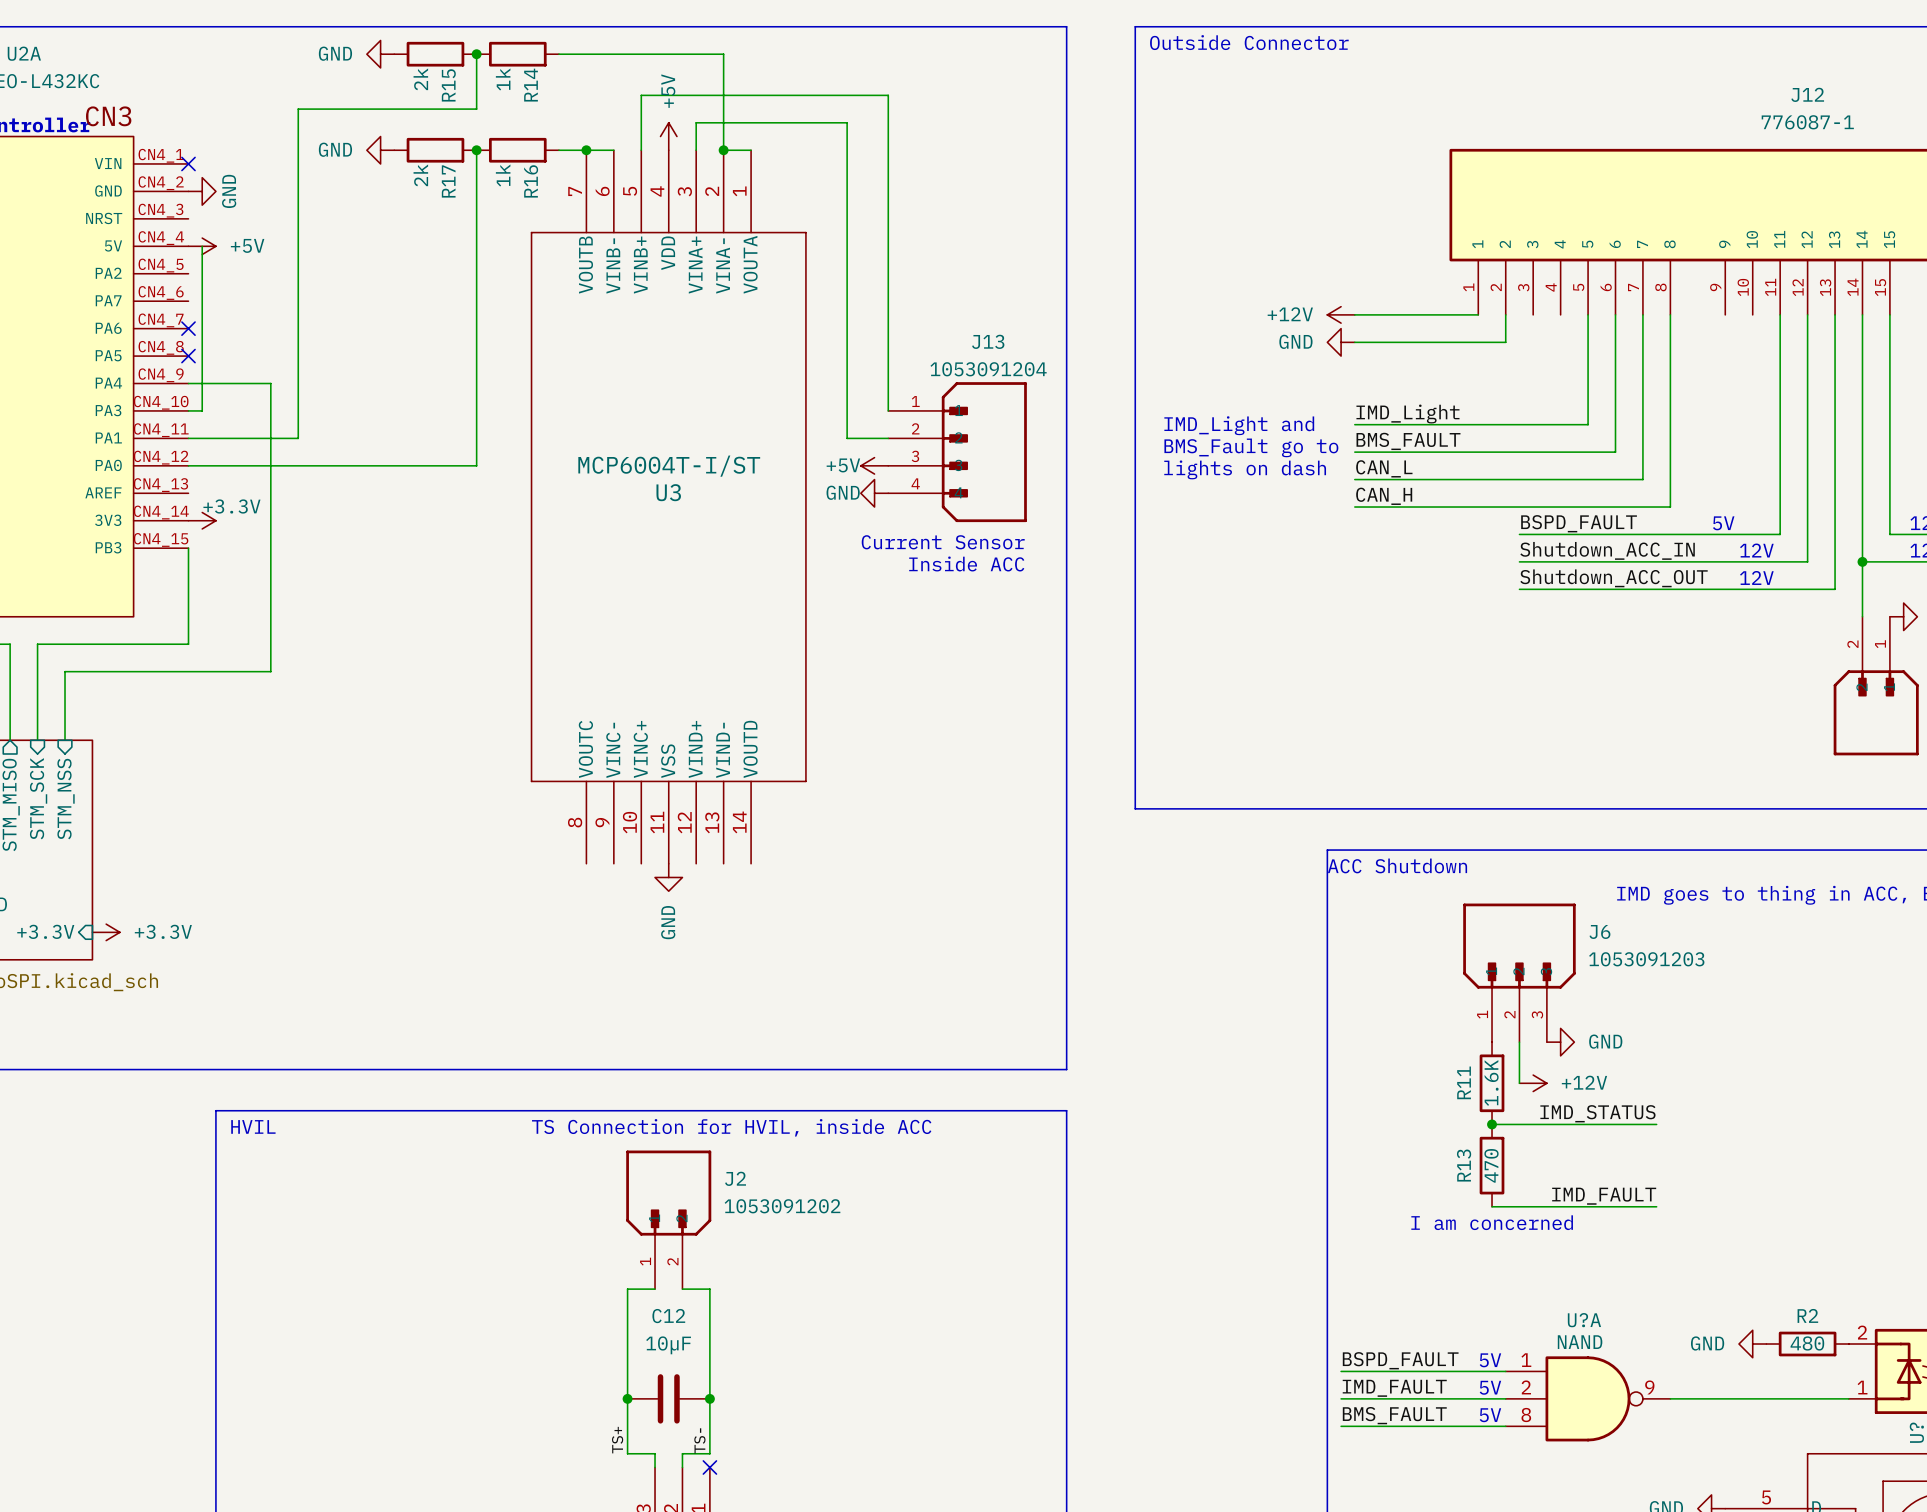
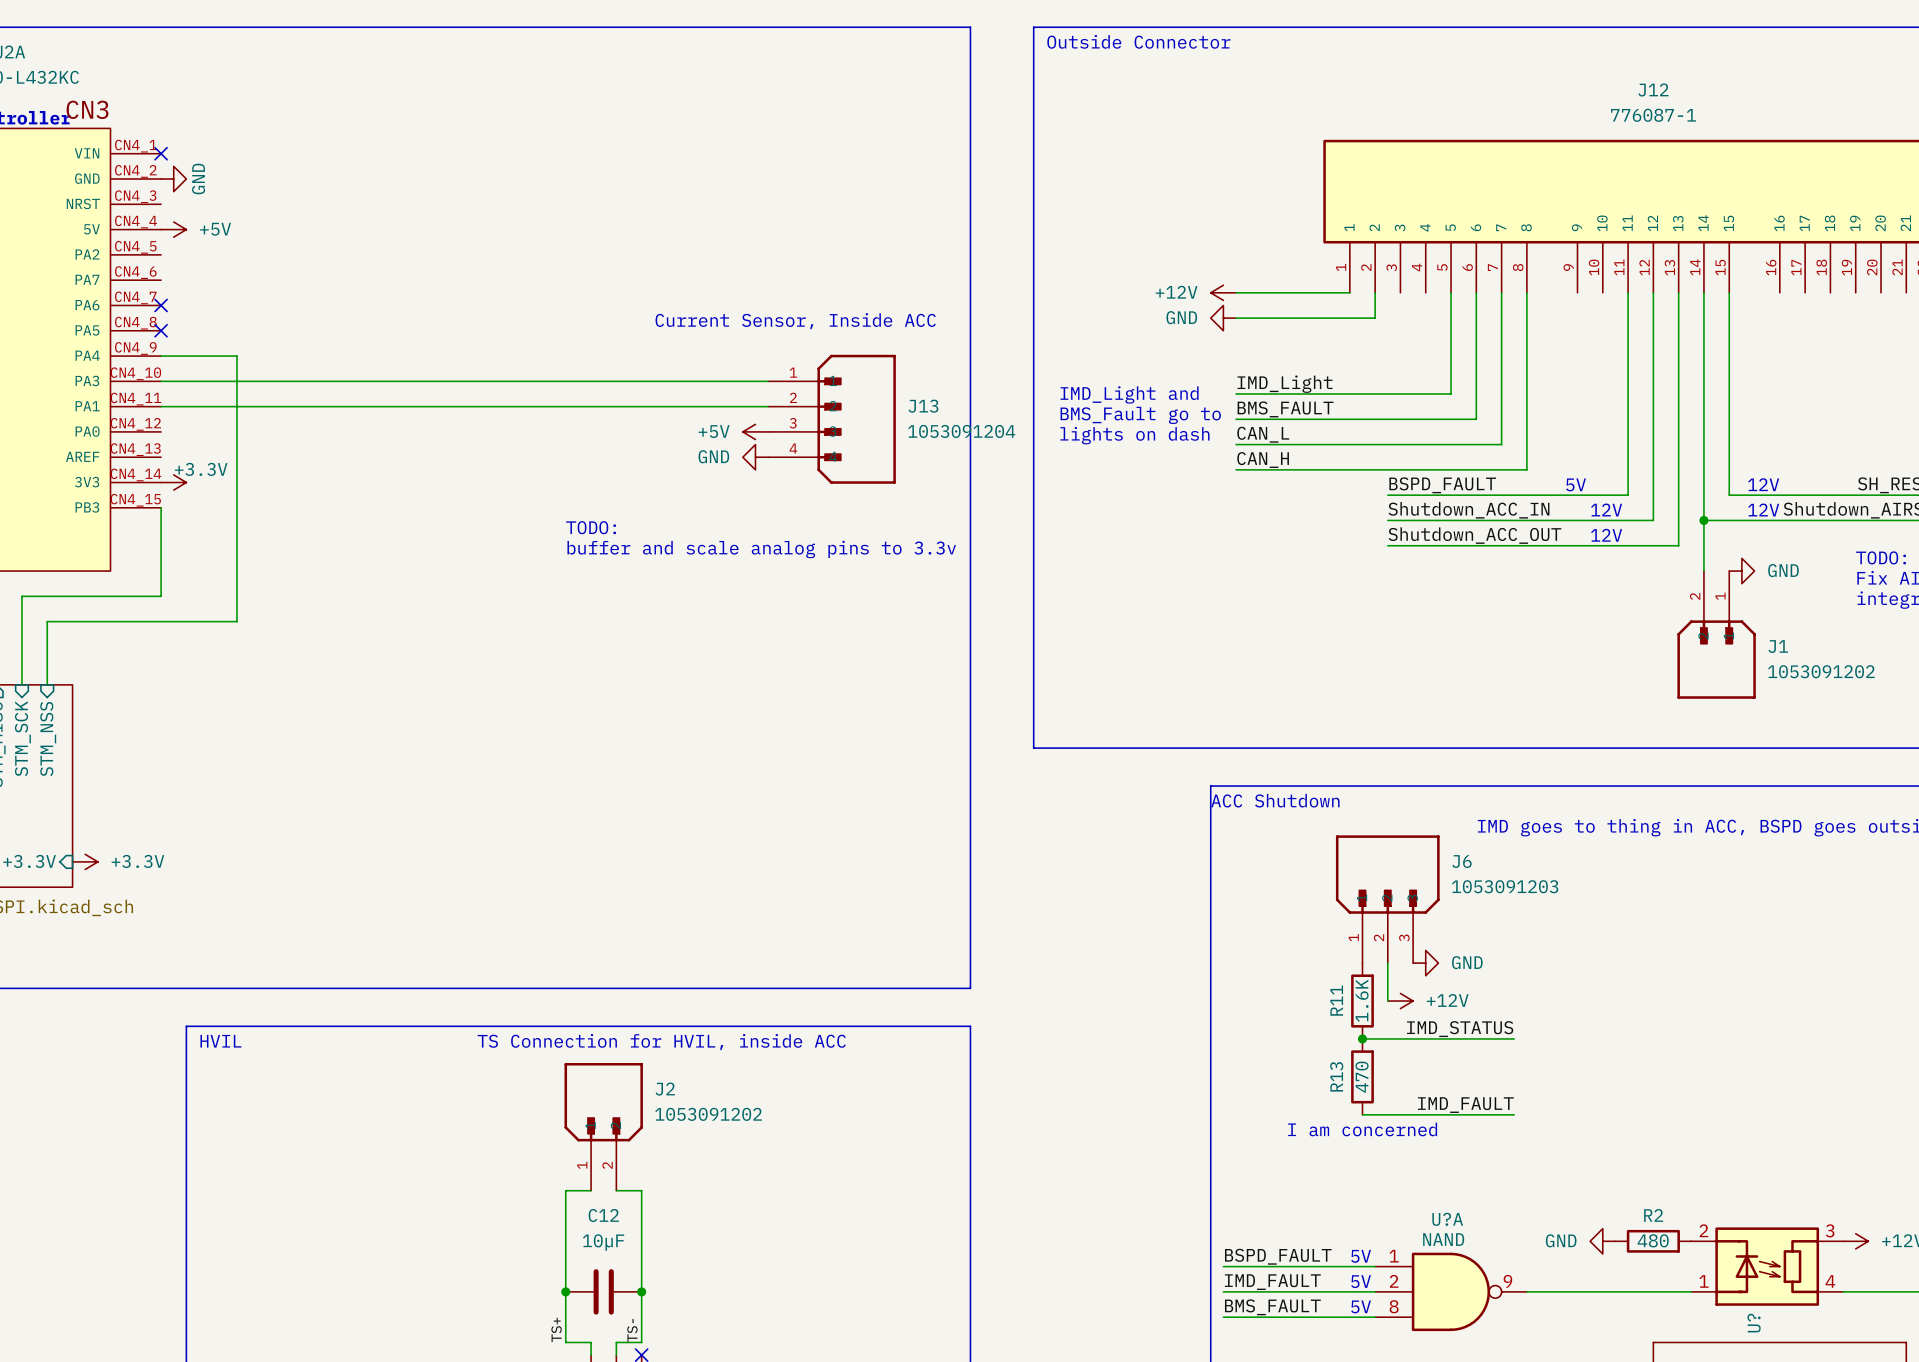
power symbol: GND (380, 54) -> none
R15: 2k (435, 54) -> none
wire: (476, 54) (476, 109) (298, 109) (298, 438) -> (768, 406) (262, 406)
junction: (476, 54) -> none
R14: 1k (517, 54) -> none
wire: (558, 54) (723, 54) (723, 150) (751, 150) -> none
power symbol: +5V (668, 136) -> none
power symbol: GND (380, 150) -> none
R17: 2k (435, 150) -> none
wire: (476, 150) (476, 465) (188, 465) -> none
junction: (476, 150) -> none
R16: 1k (517, 150) -> none
wire: (558, 150) (613, 150) -> none
junction: (586, 150) -> none
wire: (641, 150) (641, 95) (888, 95) (888, 410) -> none
wire: (696, 150) (696, 122) (847, 122) (847, 438) (888, 438) -> none
junction: (723, 150) -> none
wire: (202, 246) (202, 410) -> (768, 381) (173, 381)
J13 name position: J13 (988, 341) -> J13 (923, 406)
text: none -> Current Sensor, Inside ACC (795, 321)
J13 value position: 1053091204 (988, 369) -> 1053091204 (961, 431)
J13 position: (957, 452) -> (831, 419)
power symbol text position: +5V (843, 465) -> +5V (714, 431)
power symbol position: +5V (874, 465) -> +5V (755, 431)
power symbol text position: GND (843, 492) -> GND (713, 456)
power symbol position: GND (874, 493) -> GND (755, 457)
U3: MCP6004T-I/ST (668, 507) -> none
text: Current Sensor (943, 542) -> none
text: Inside ACC (966, 564) -> none
text: none -> TODO: (591, 527)
text: none -> buffer and scale analog pins to 3.3v (761, 549)
power symbol: GND (668, 877) -> none

